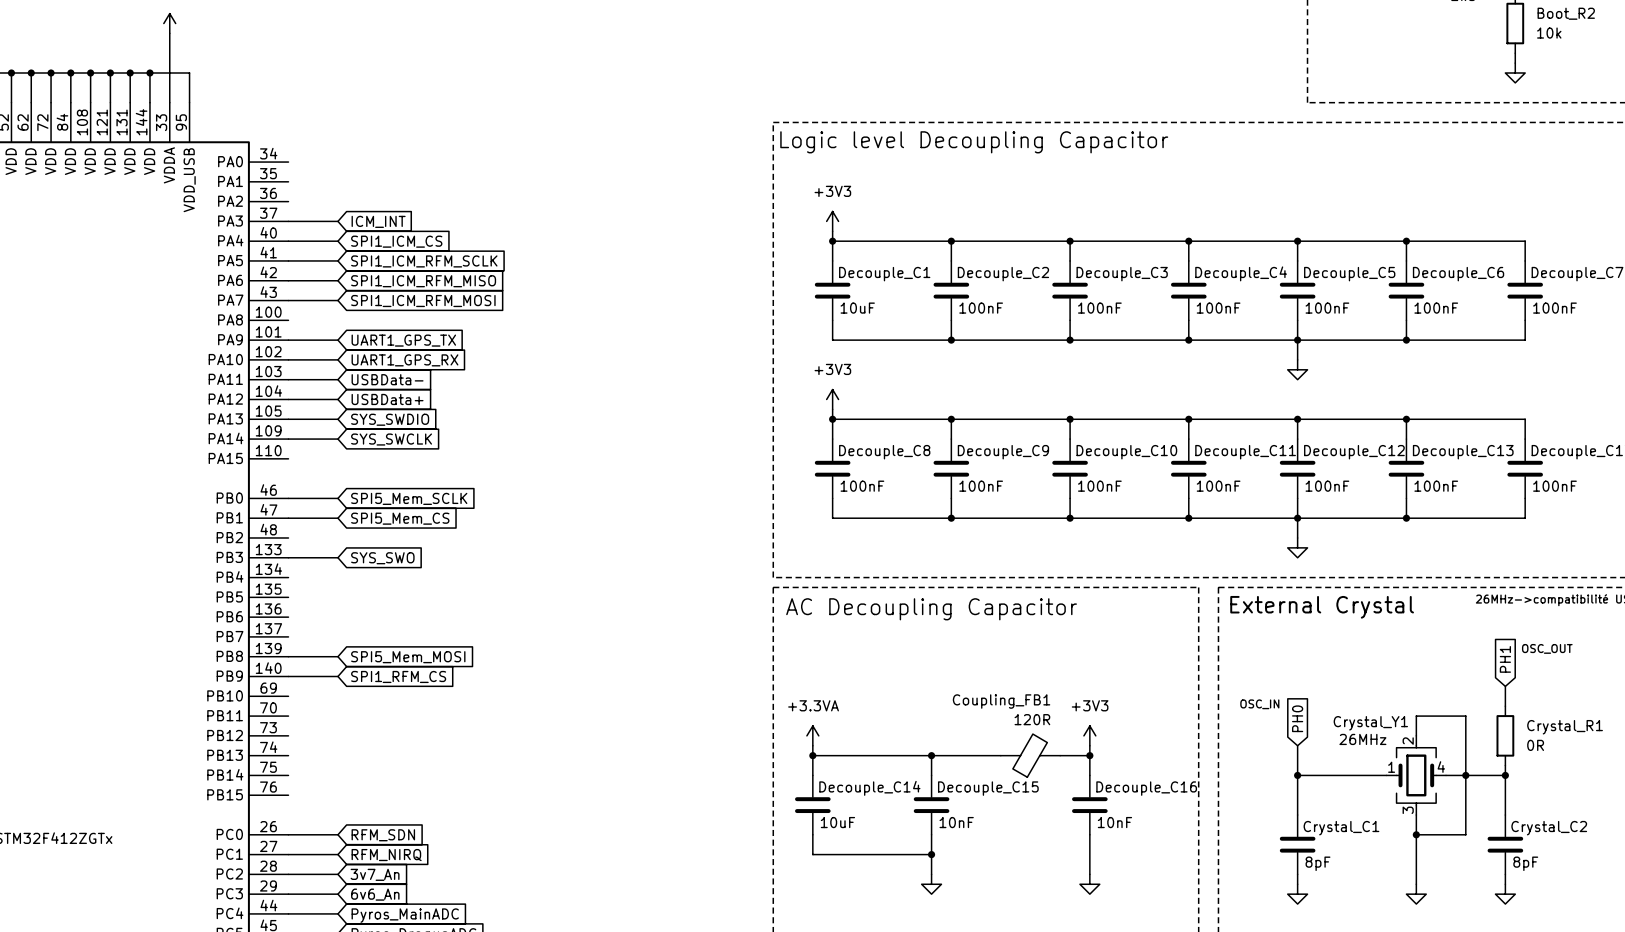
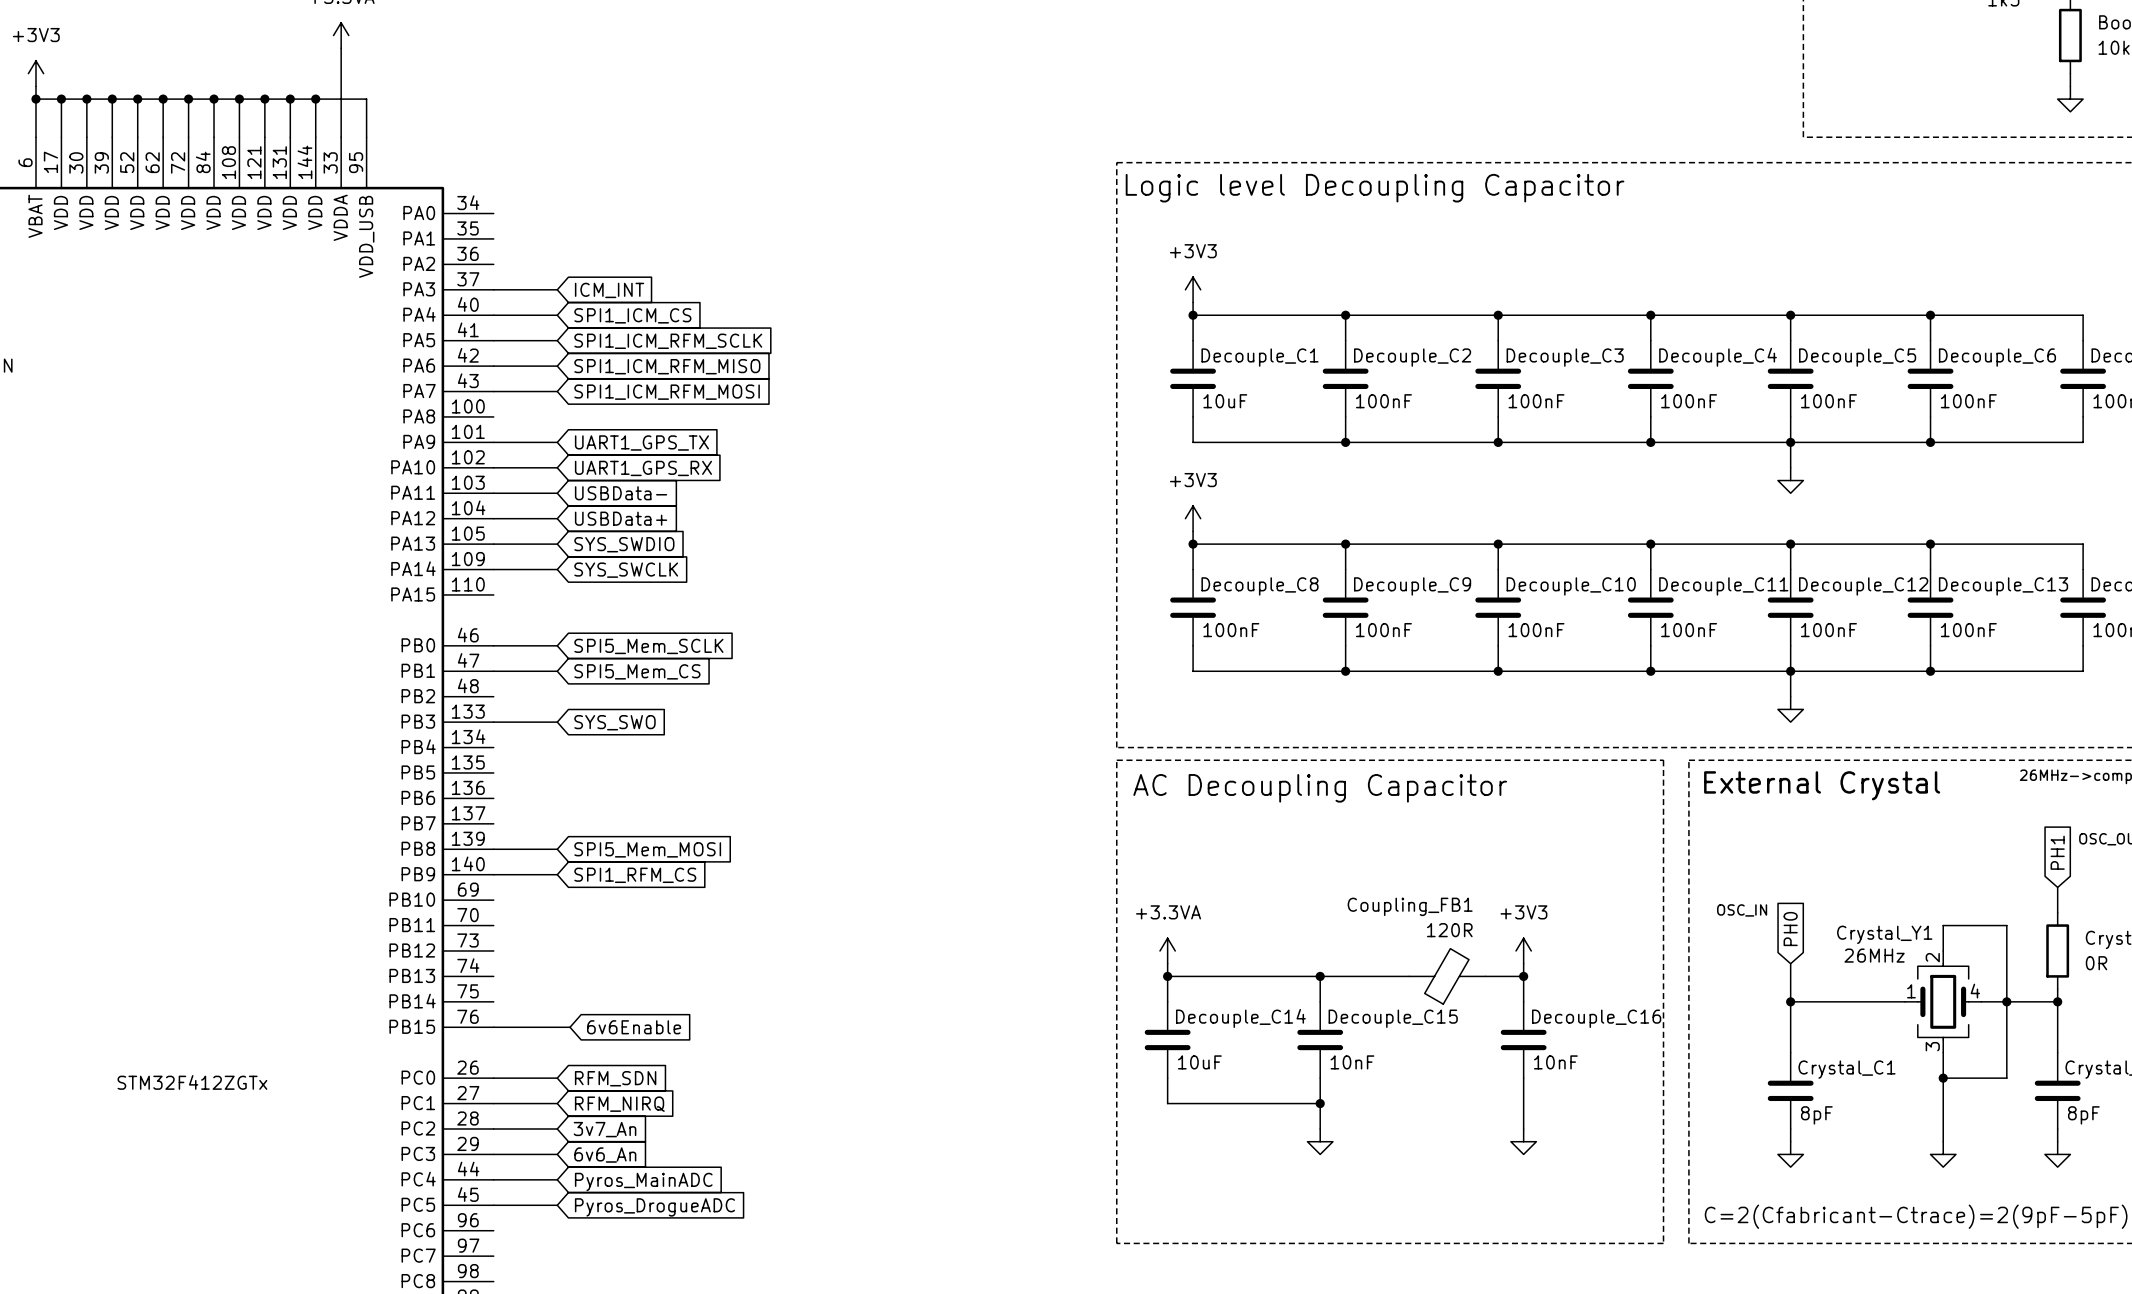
wire: none -> (493, 1027) (570, 1027)
global label: none -> 6v6Enable (634, 1027)

